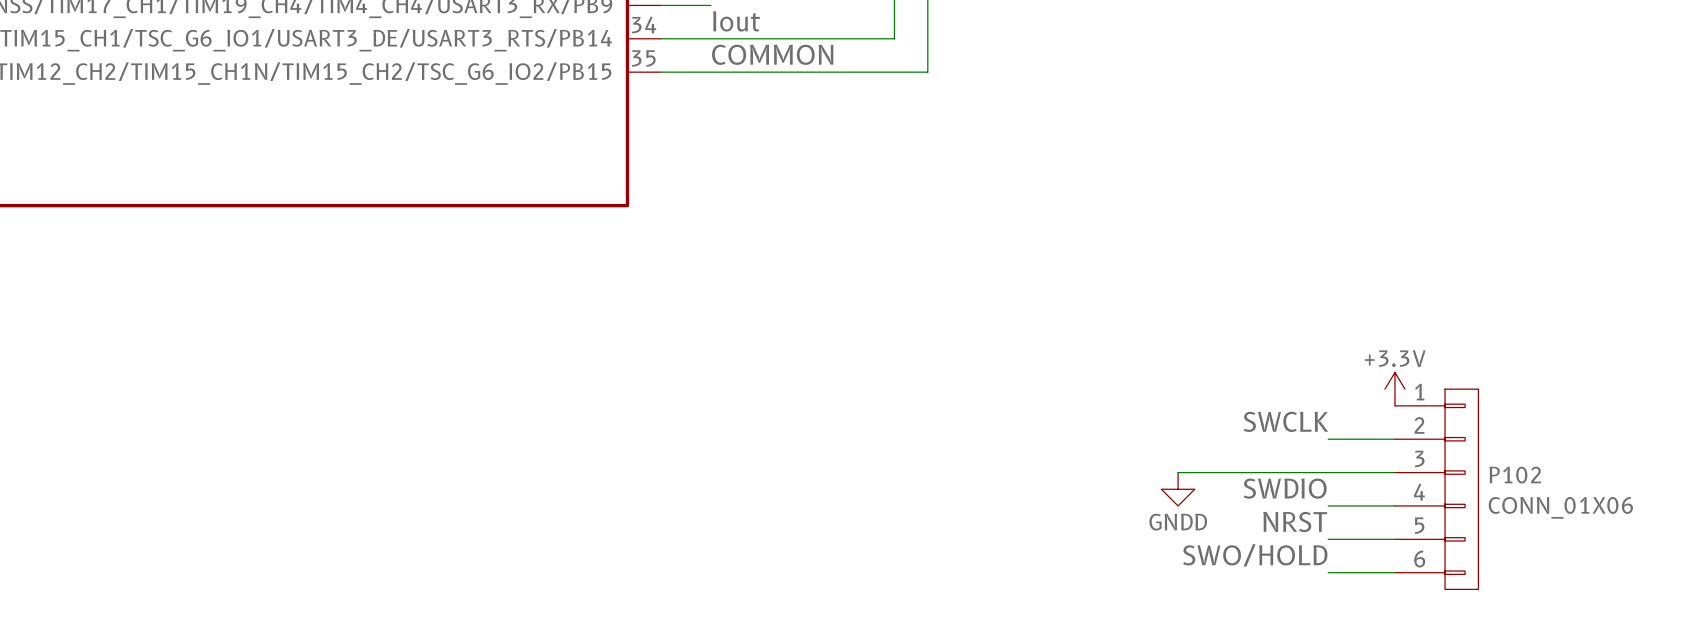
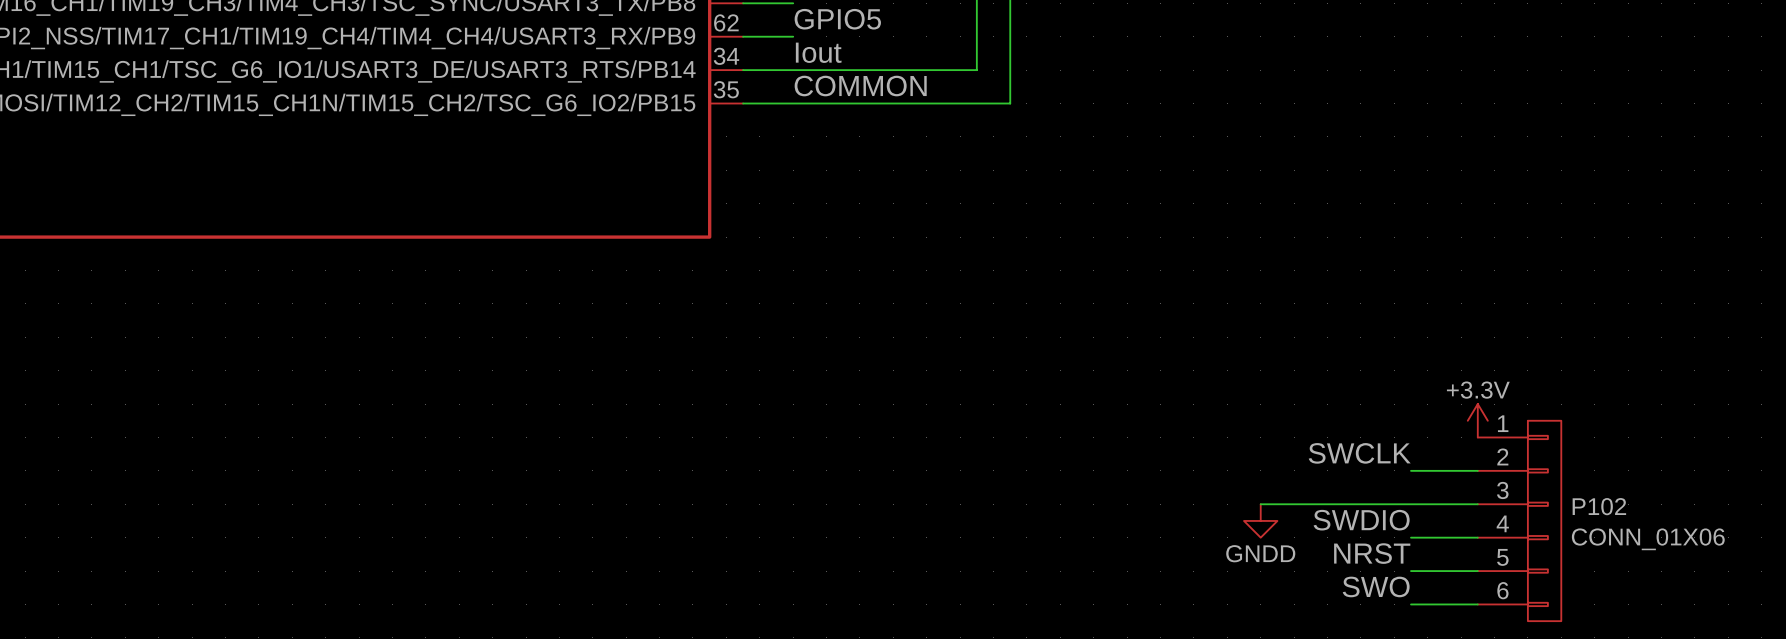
label: SWO/HOLD (1255, 555) -> SWO (1376, 586)

